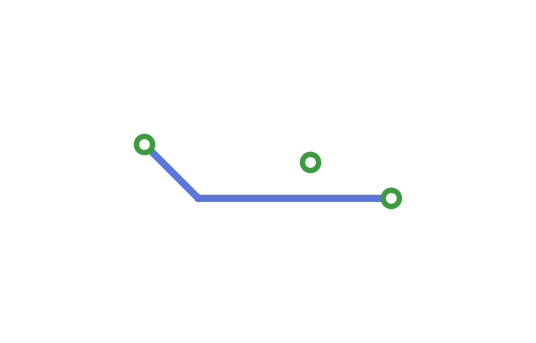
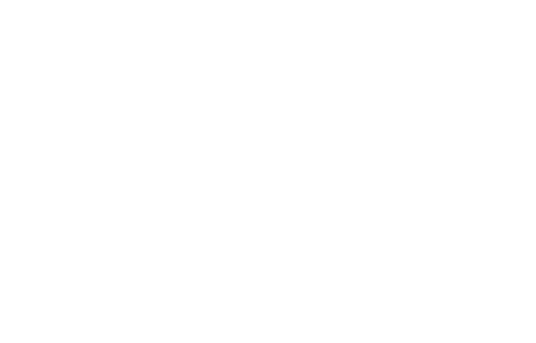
track: (144, 144) (198, 198) (391, 198) -> none
via: (144, 144) -> none
via: (310, 162) -> none
via: (391, 198) -> none

